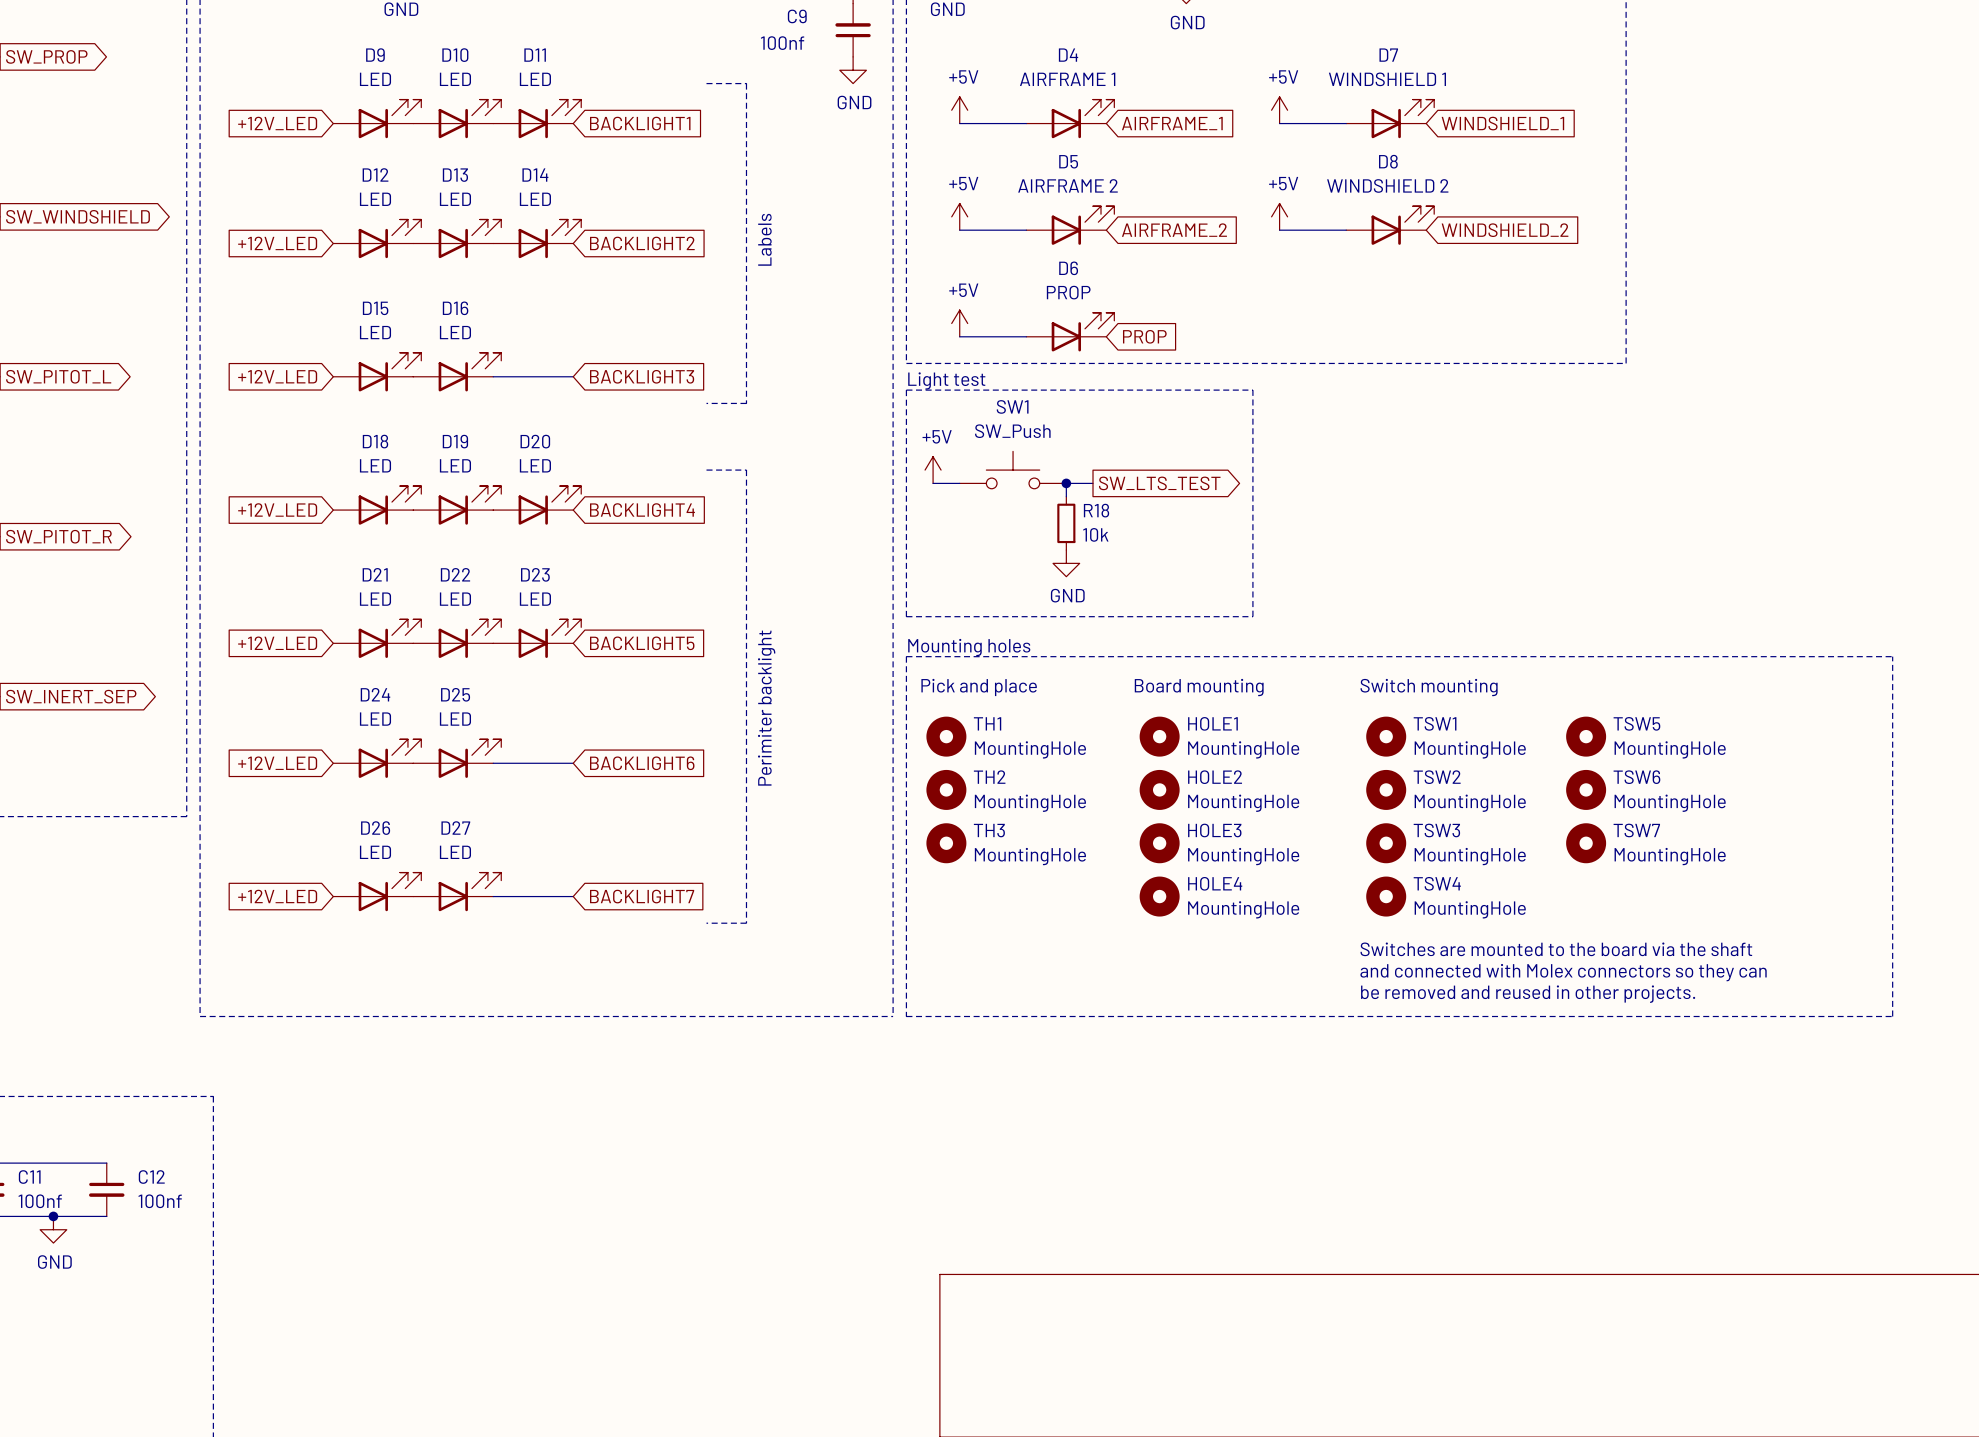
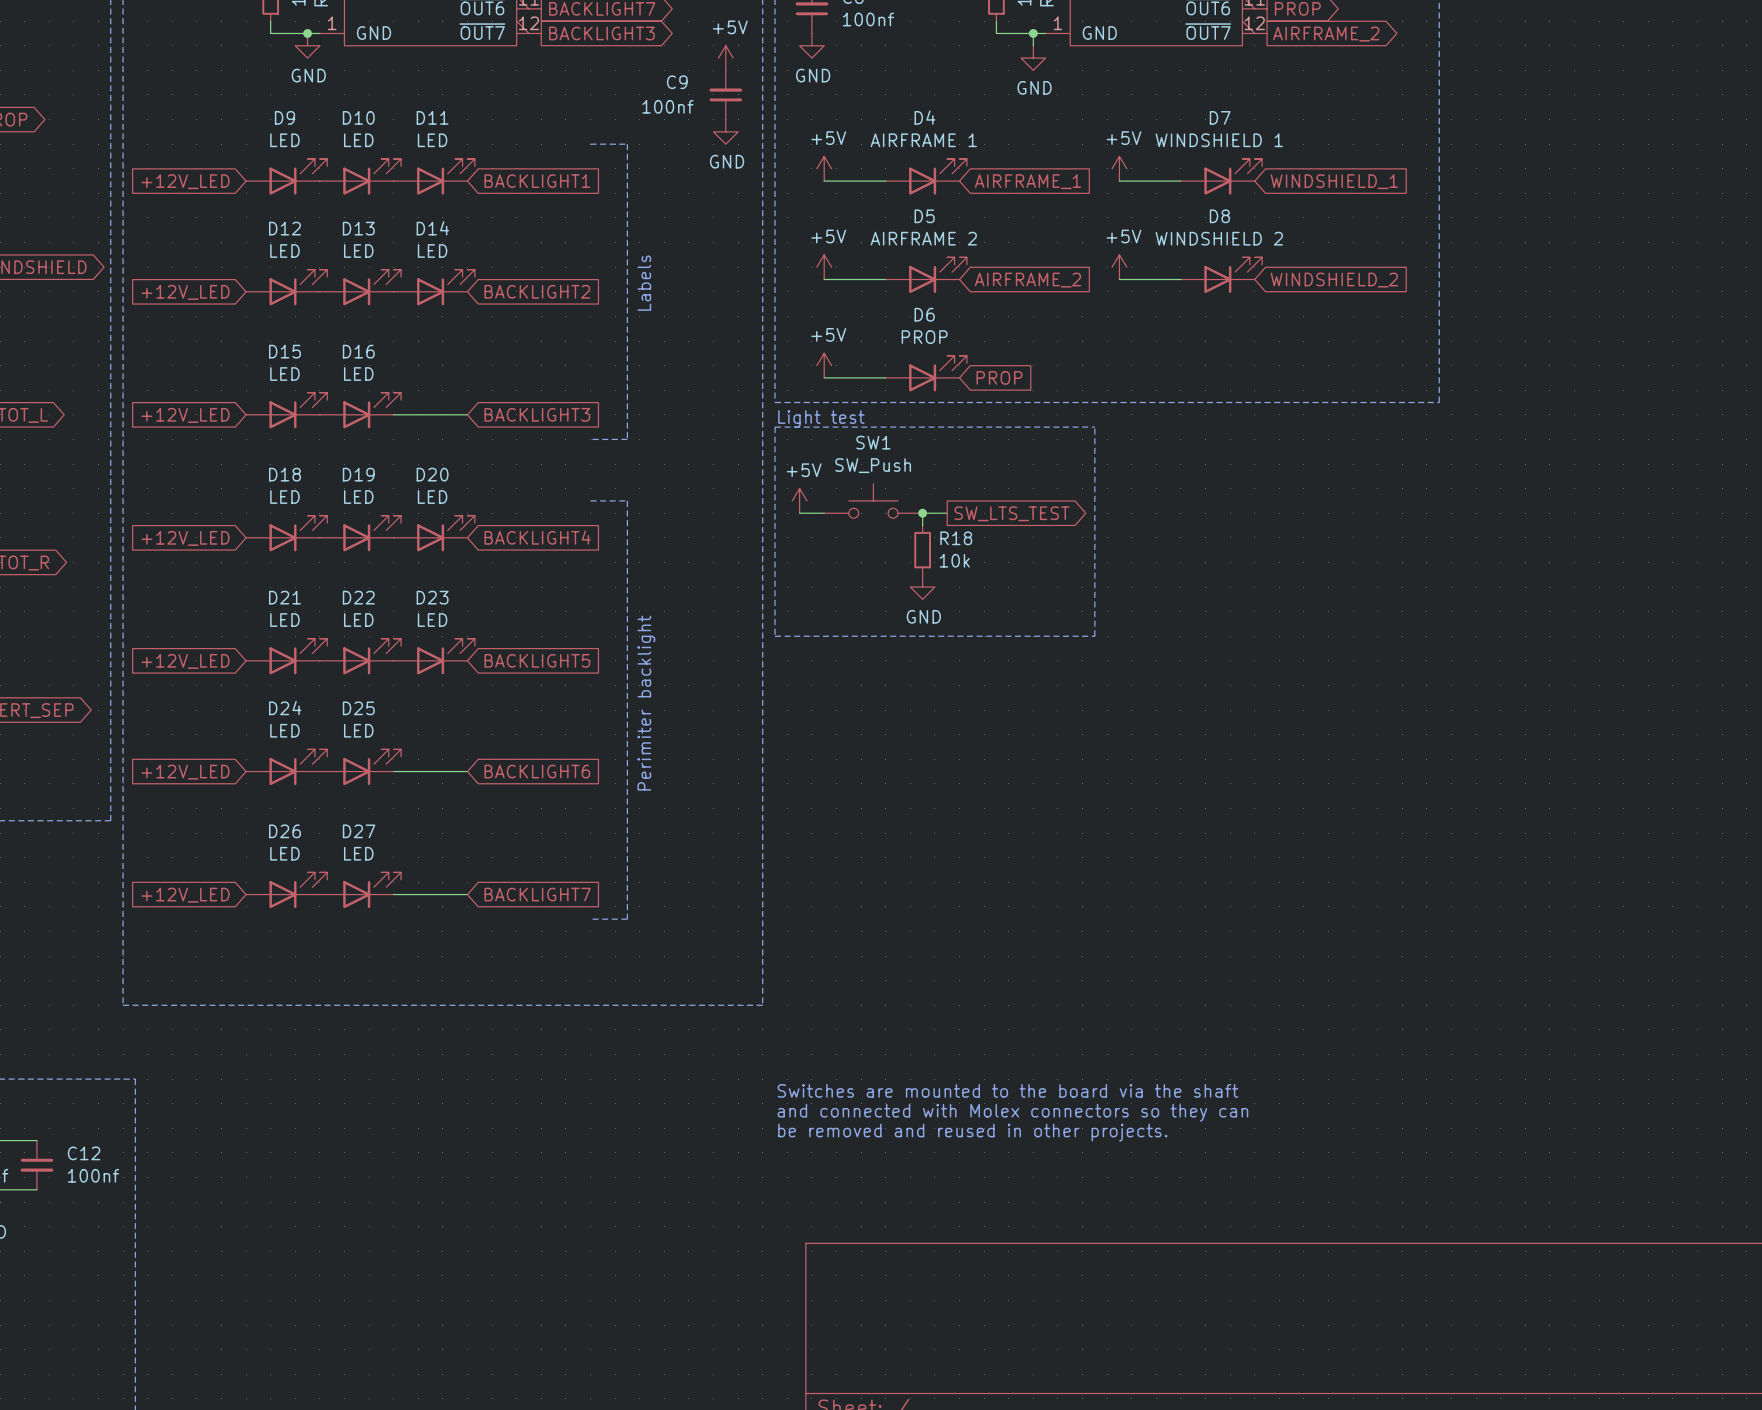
text: Mounting holes (969, 647) -> none
line: (906, 656) (906, 1016) (1892, 1016) (1892, 656) (906, 656) -> none
text: Pick and place (979, 687) -> none
text: Board mounting (1199, 687) -> none
text: Switch mounting (1429, 687) -> none
TH1: MountingHole (946, 736) -> none
HOLE1: MountingHole (1159, 736) -> none
TSW1: MountingHole (1386, 736) -> none
TSW5: MountingHole (1586, 736) -> none
TH2: MountingHole (946, 789) -> none
HOLE2: MountingHole (1159, 789) -> none
TSW2: MountingHole (1386, 789) -> none
TSW6: MountingHole (1586, 789) -> none
TH3: MountingHole (946, 843) -> none
HOLE3: MountingHole (1159, 843) -> none
TSW3: MountingHole (1386, 843) -> none
TSW7: MountingHole (1586, 843) -> none
HOLE4: MountingHole (1159, 896) -> none
TSW4: MountingHole (1386, 896) -> none
text: Switches are mounted to the board via the shaft (1556, 949) -> none
text: and connected with Molex connectors so they can (1563, 972) -> none
text: be removed and reused in other projects. (1528, 994) -> none
text: none -> Switches are mounted to the board via the shaft (1007, 1090)
text: none -> and connected with Molex connectors so they can (1012, 1112)
text: none -> be removed and reused in other projects. (972, 1132)

